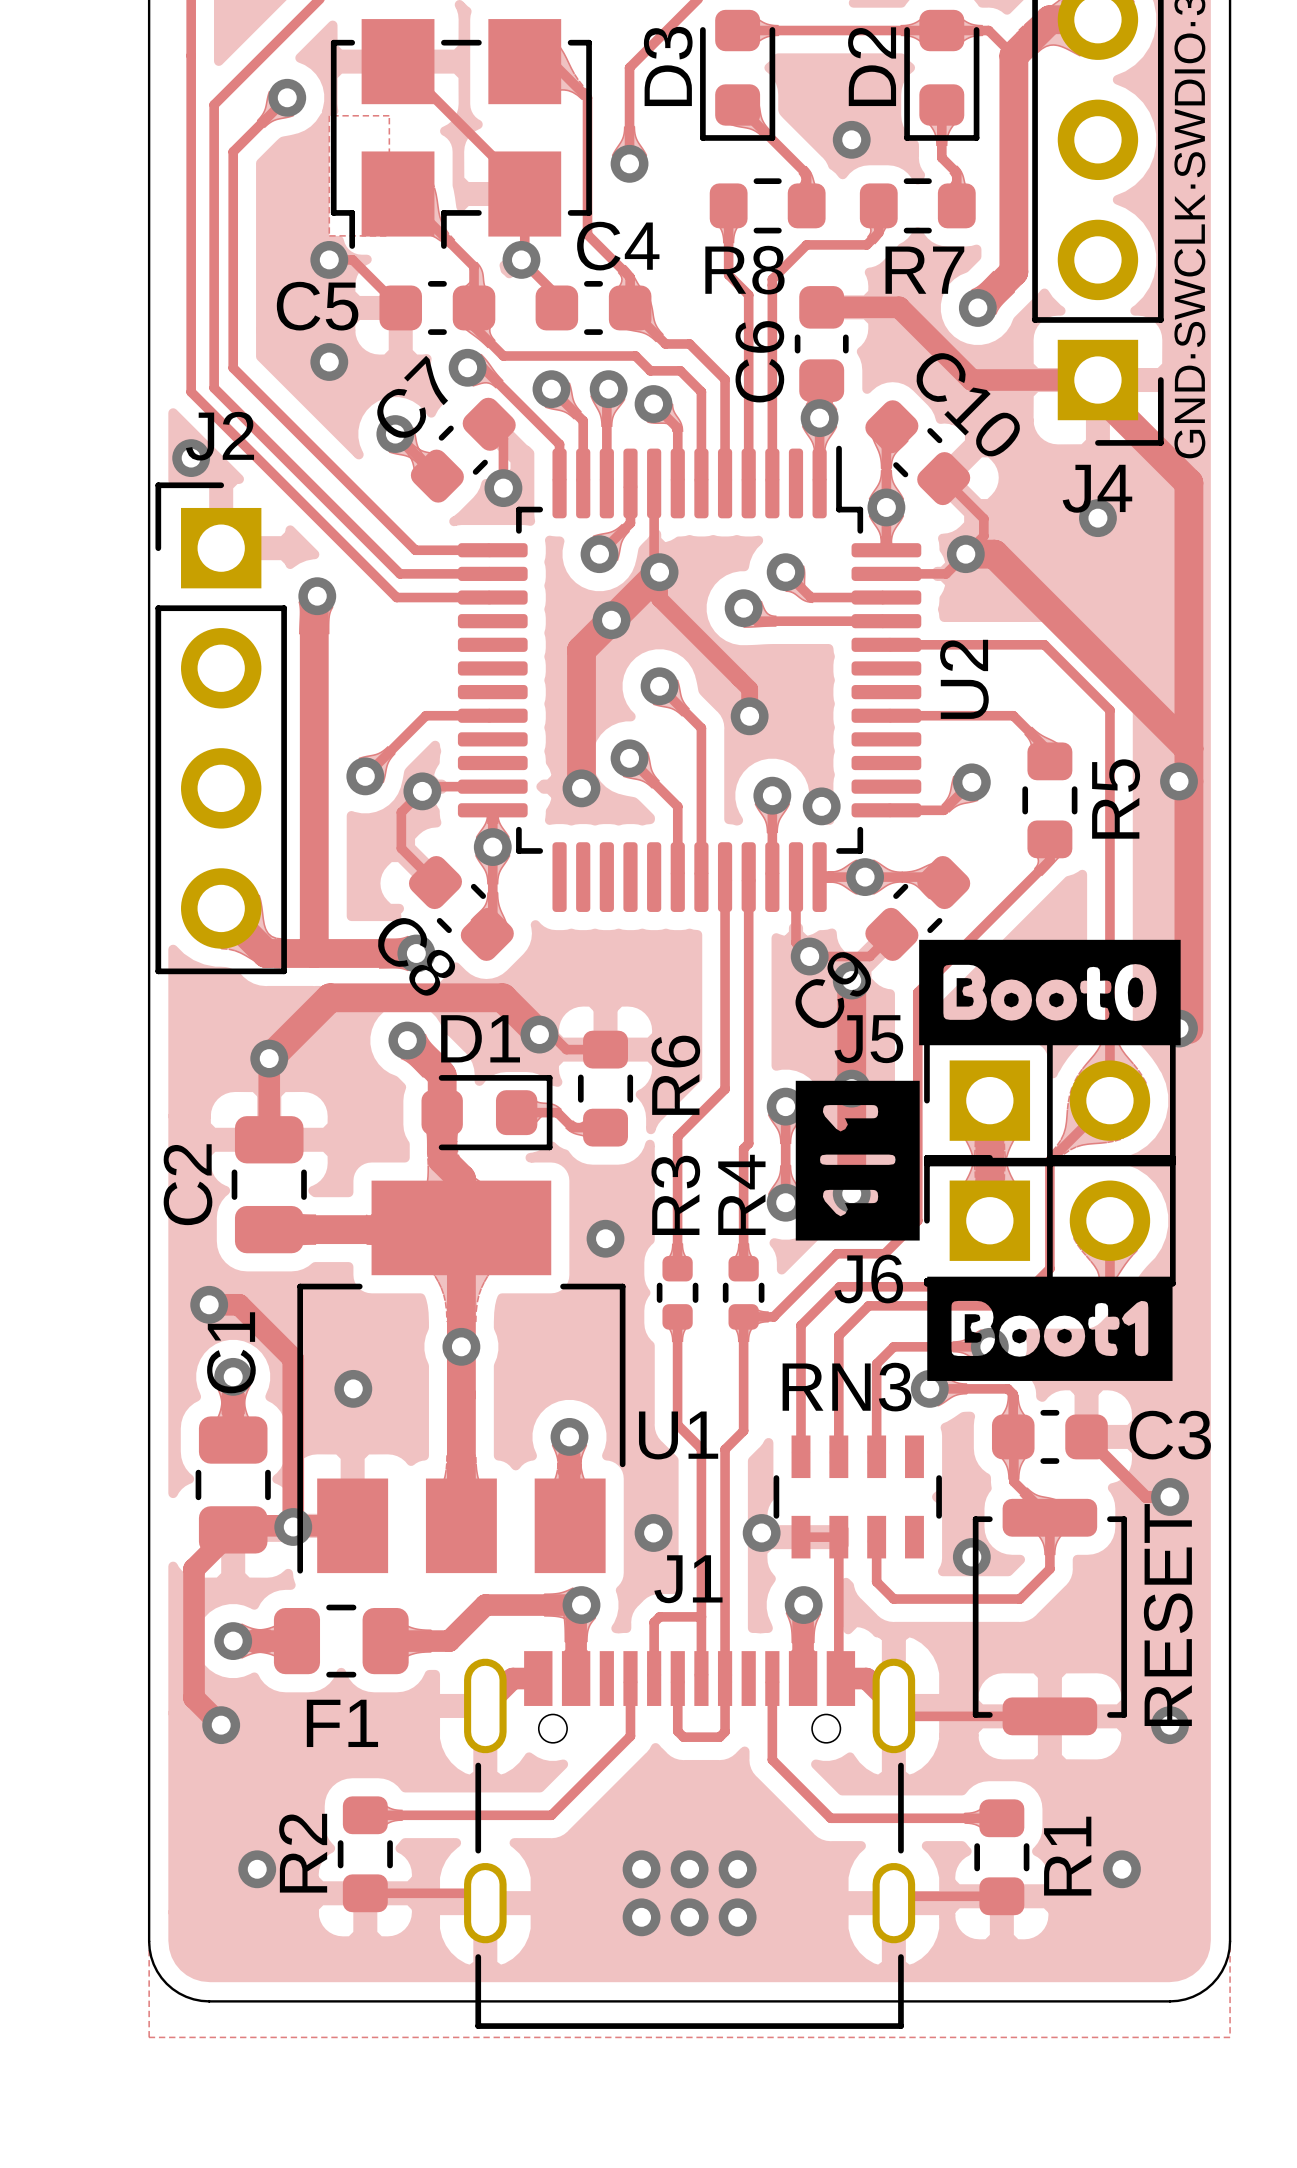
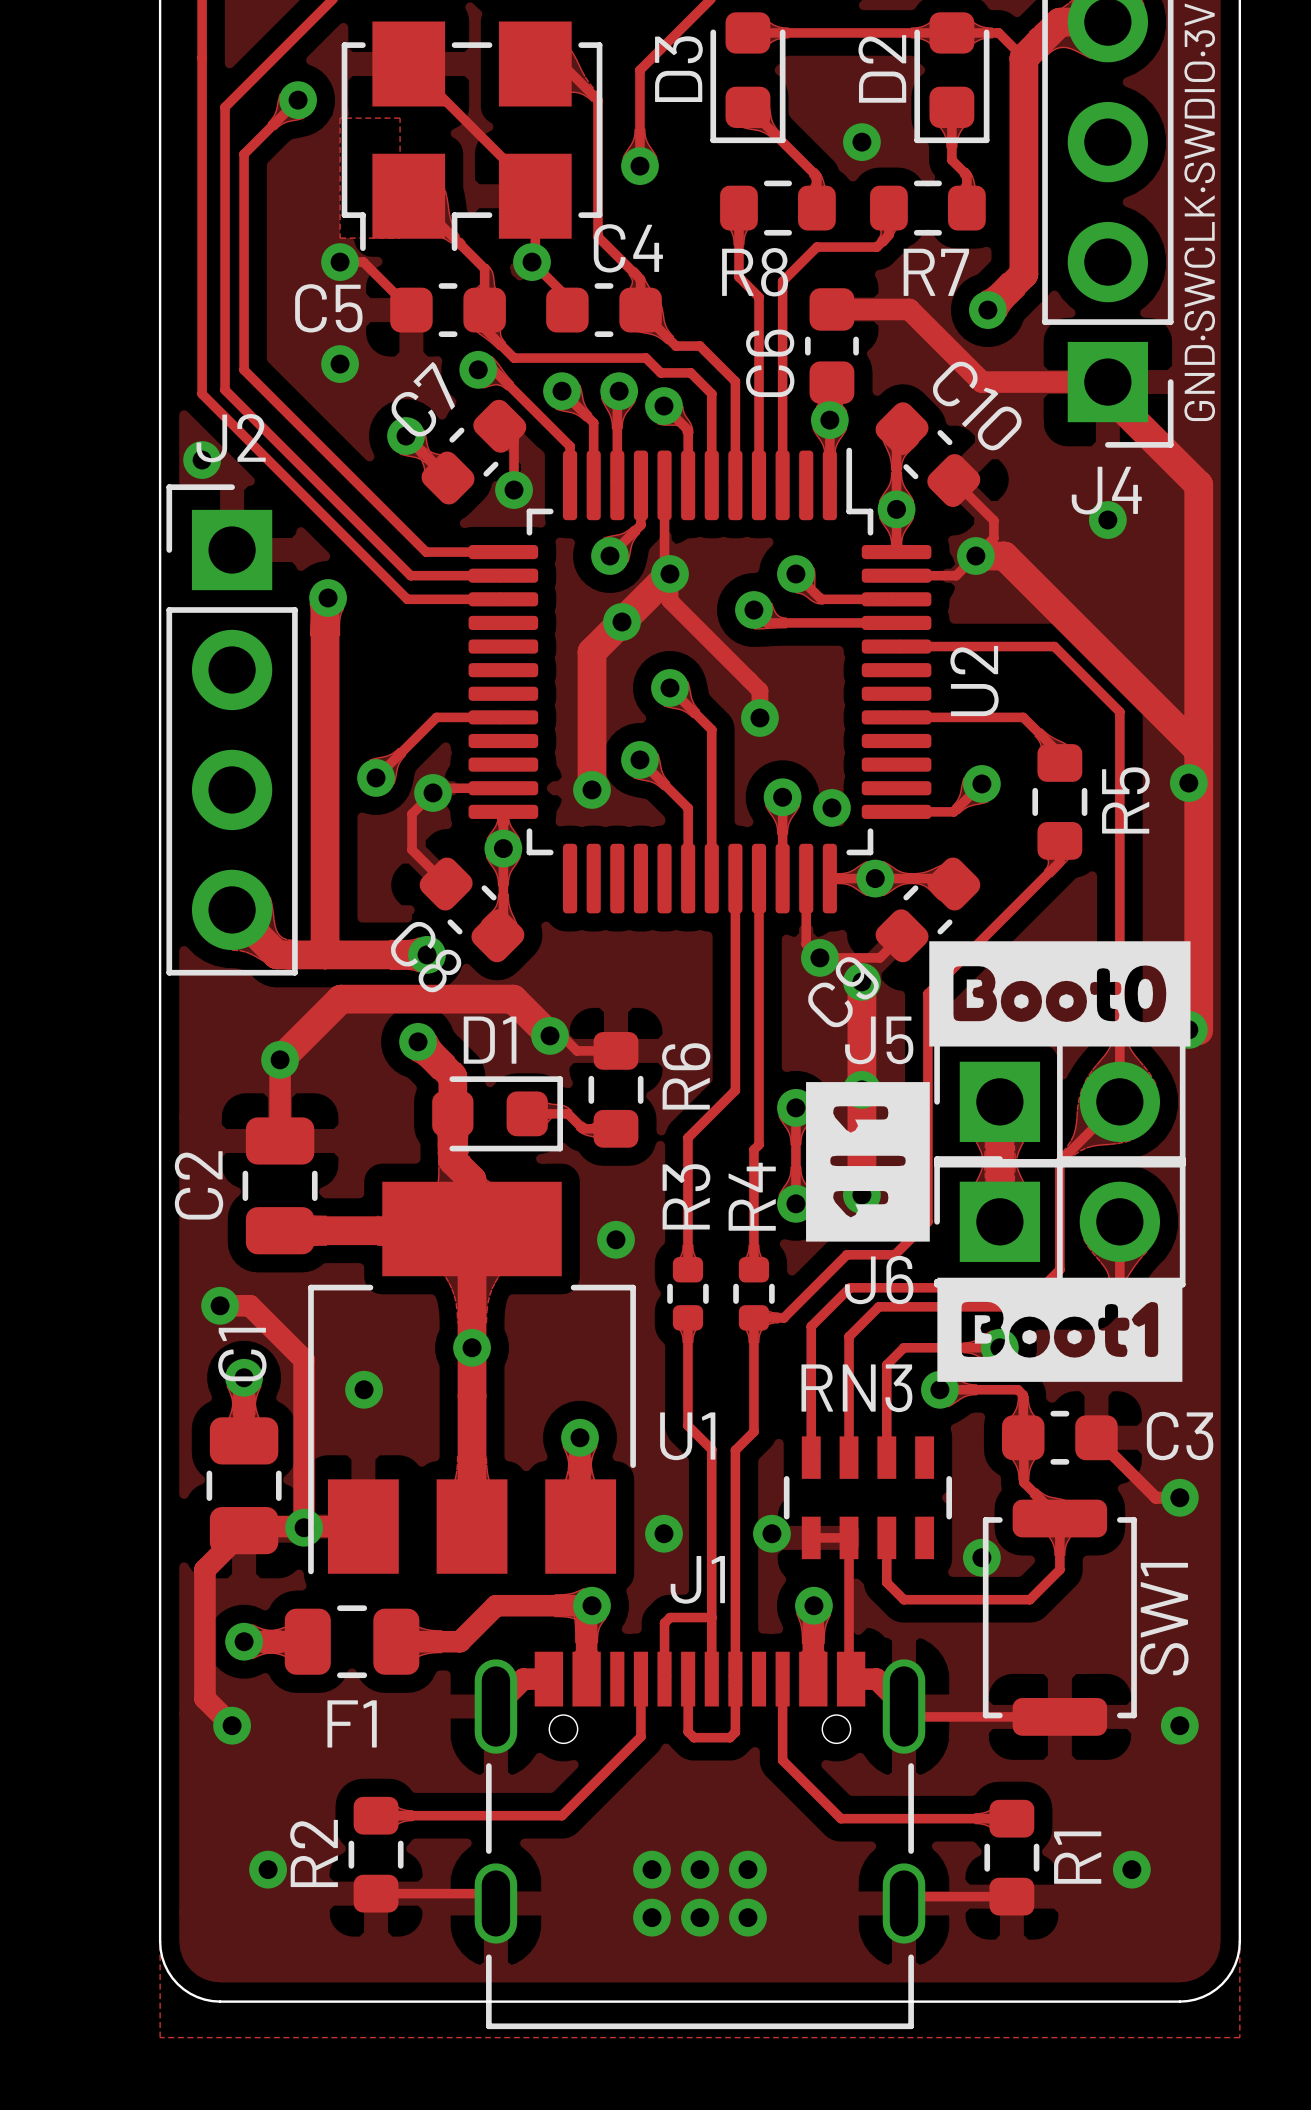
SW1 text: RESET (1168, 1615) -> none
SW1 name: none -> SW1 (1164, 1619)

